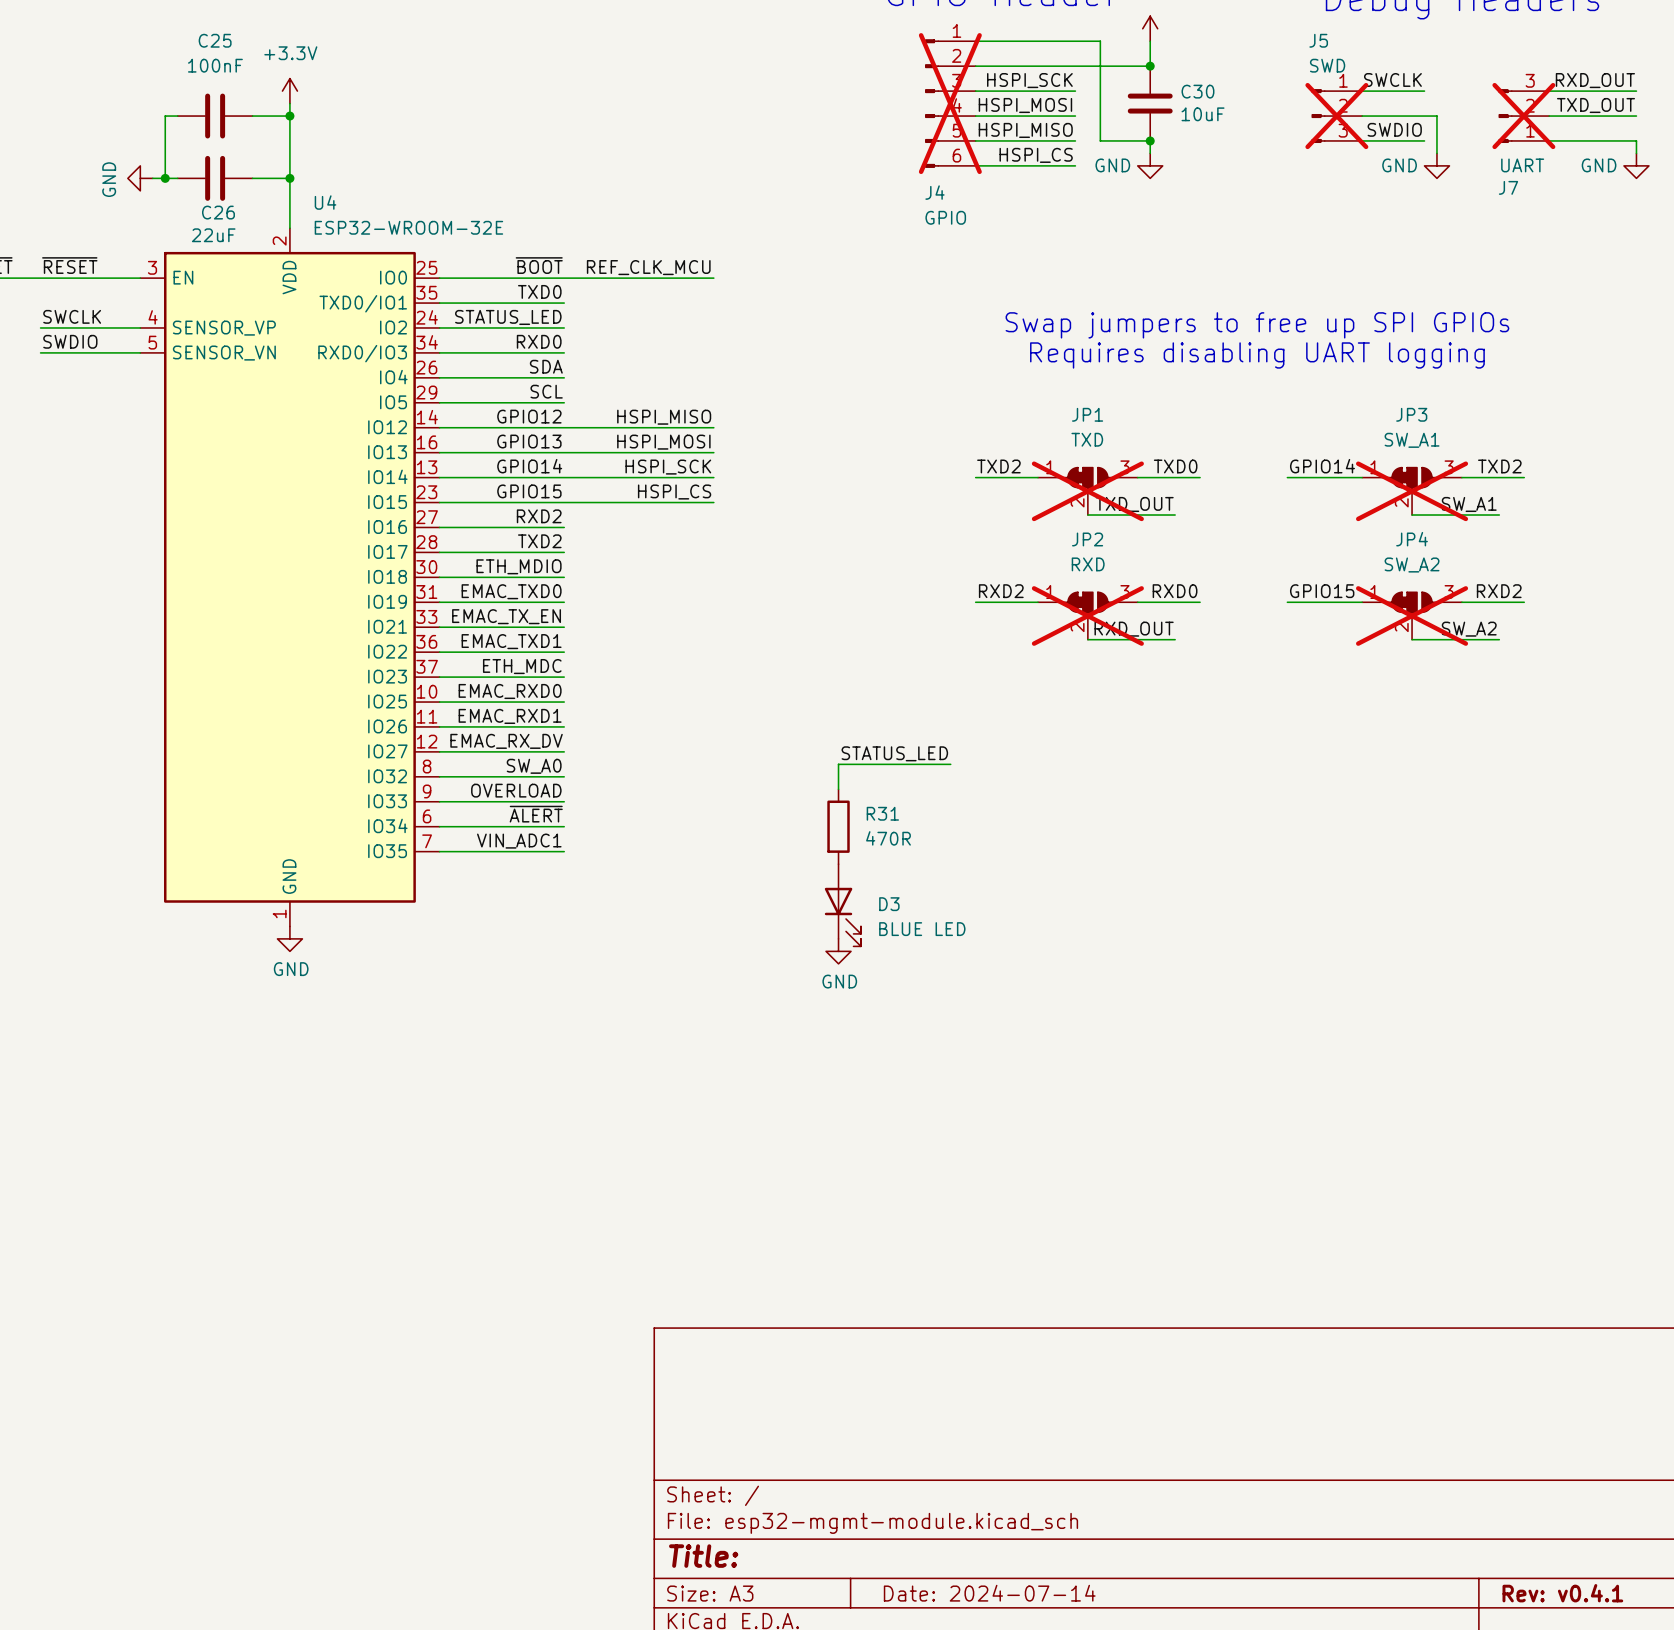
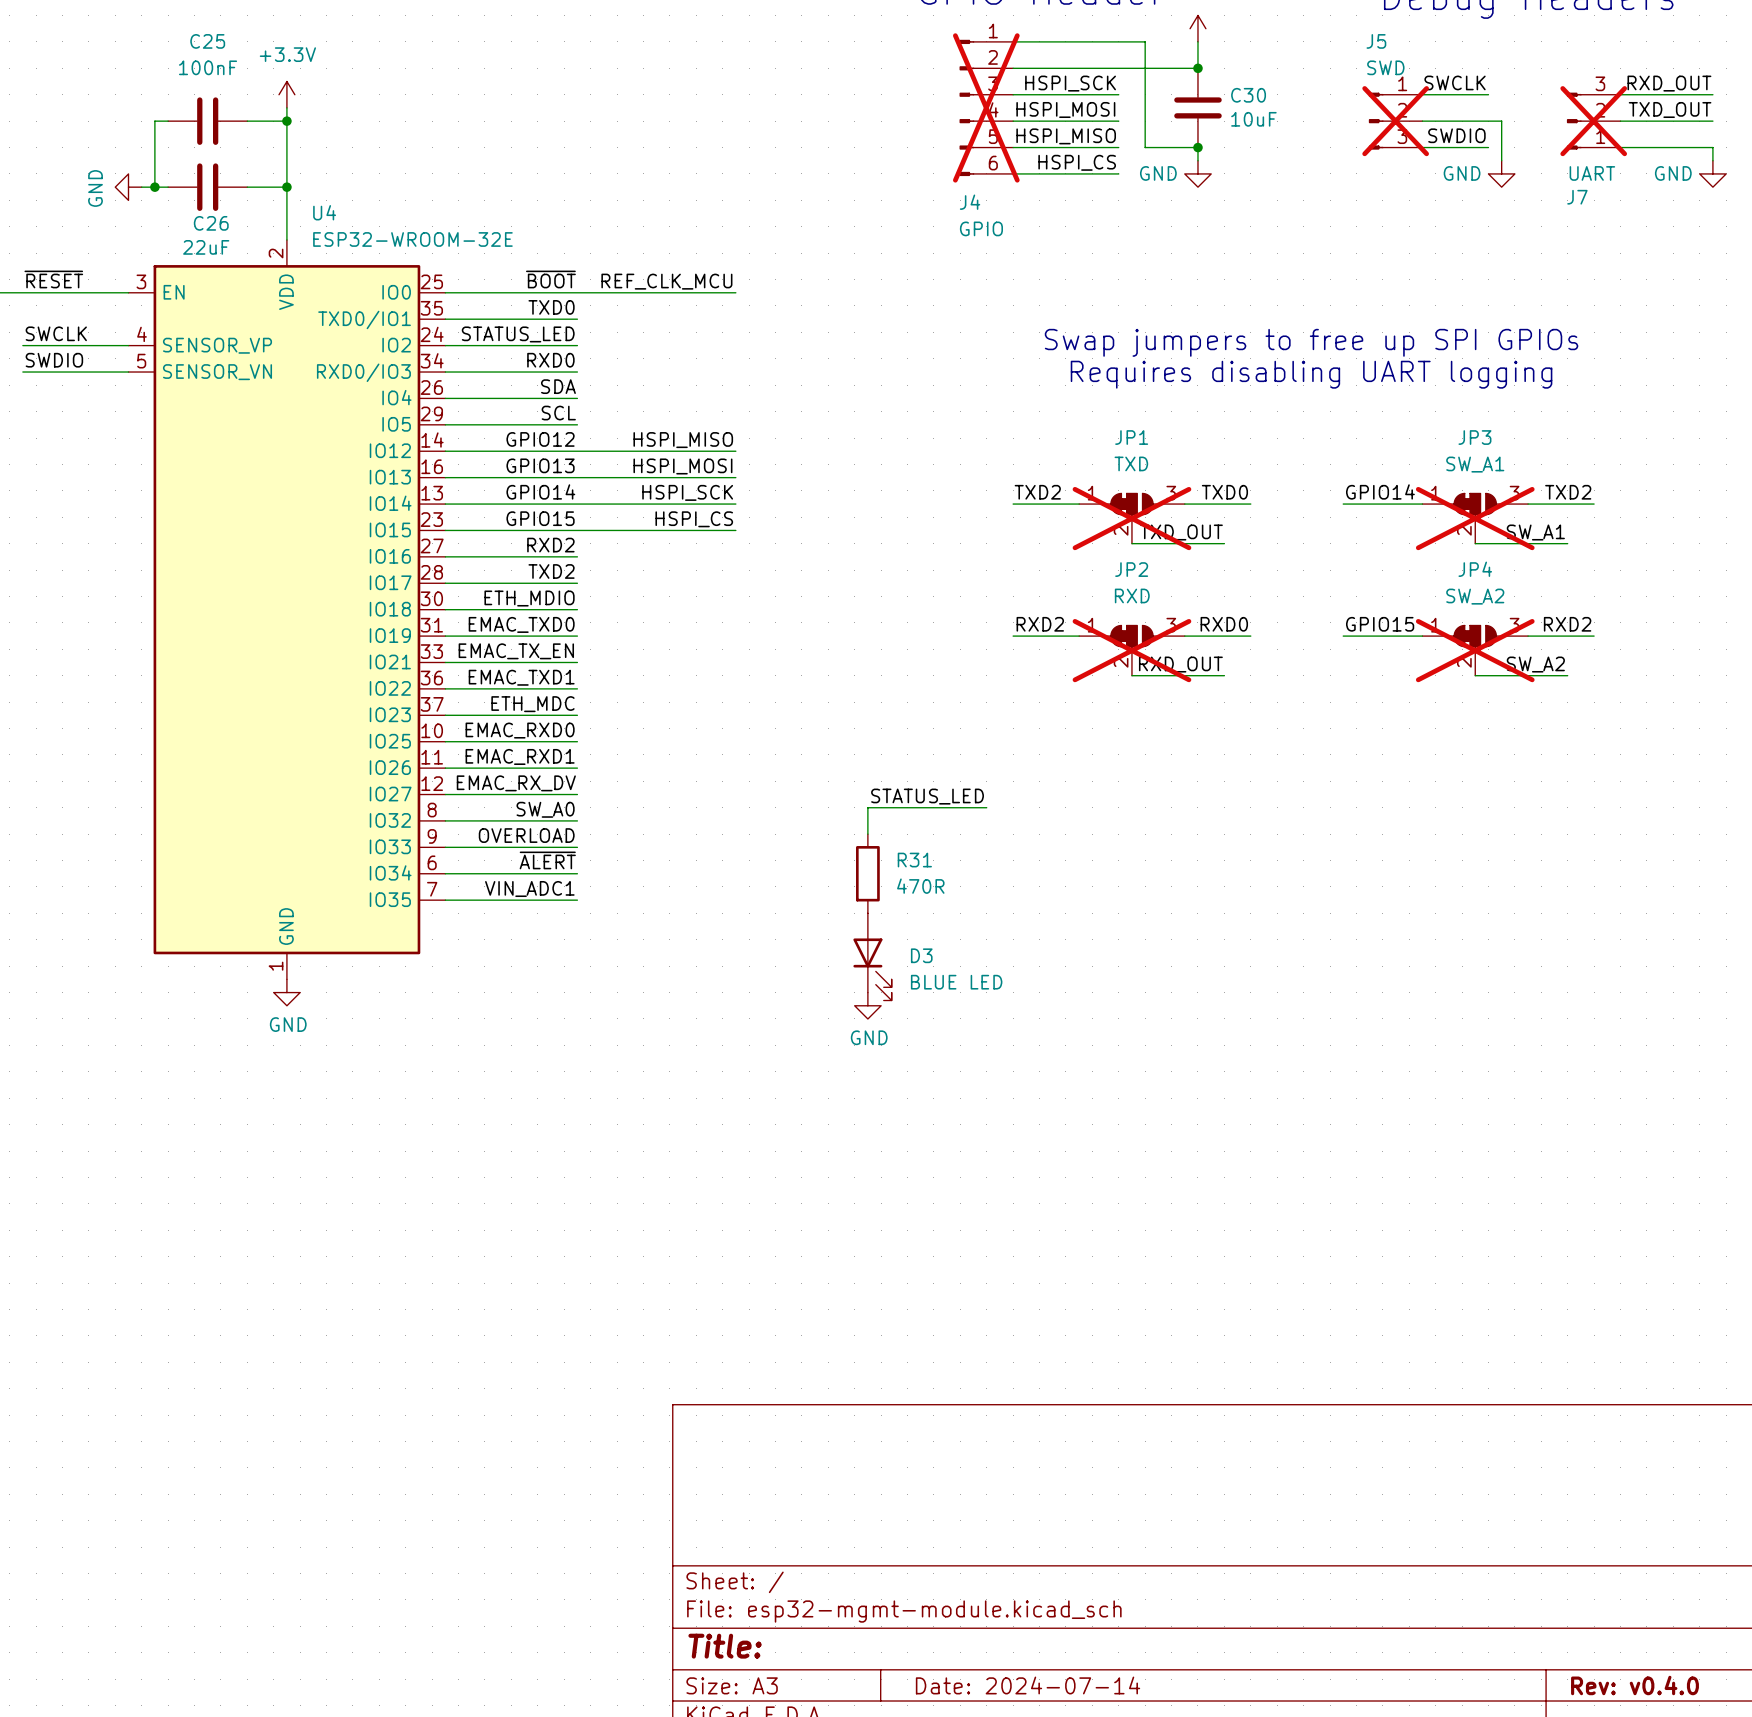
title block: Rev: v0.4.1 (1562, 1593) -> Rev: v0.4.0 (1635, 1685)

